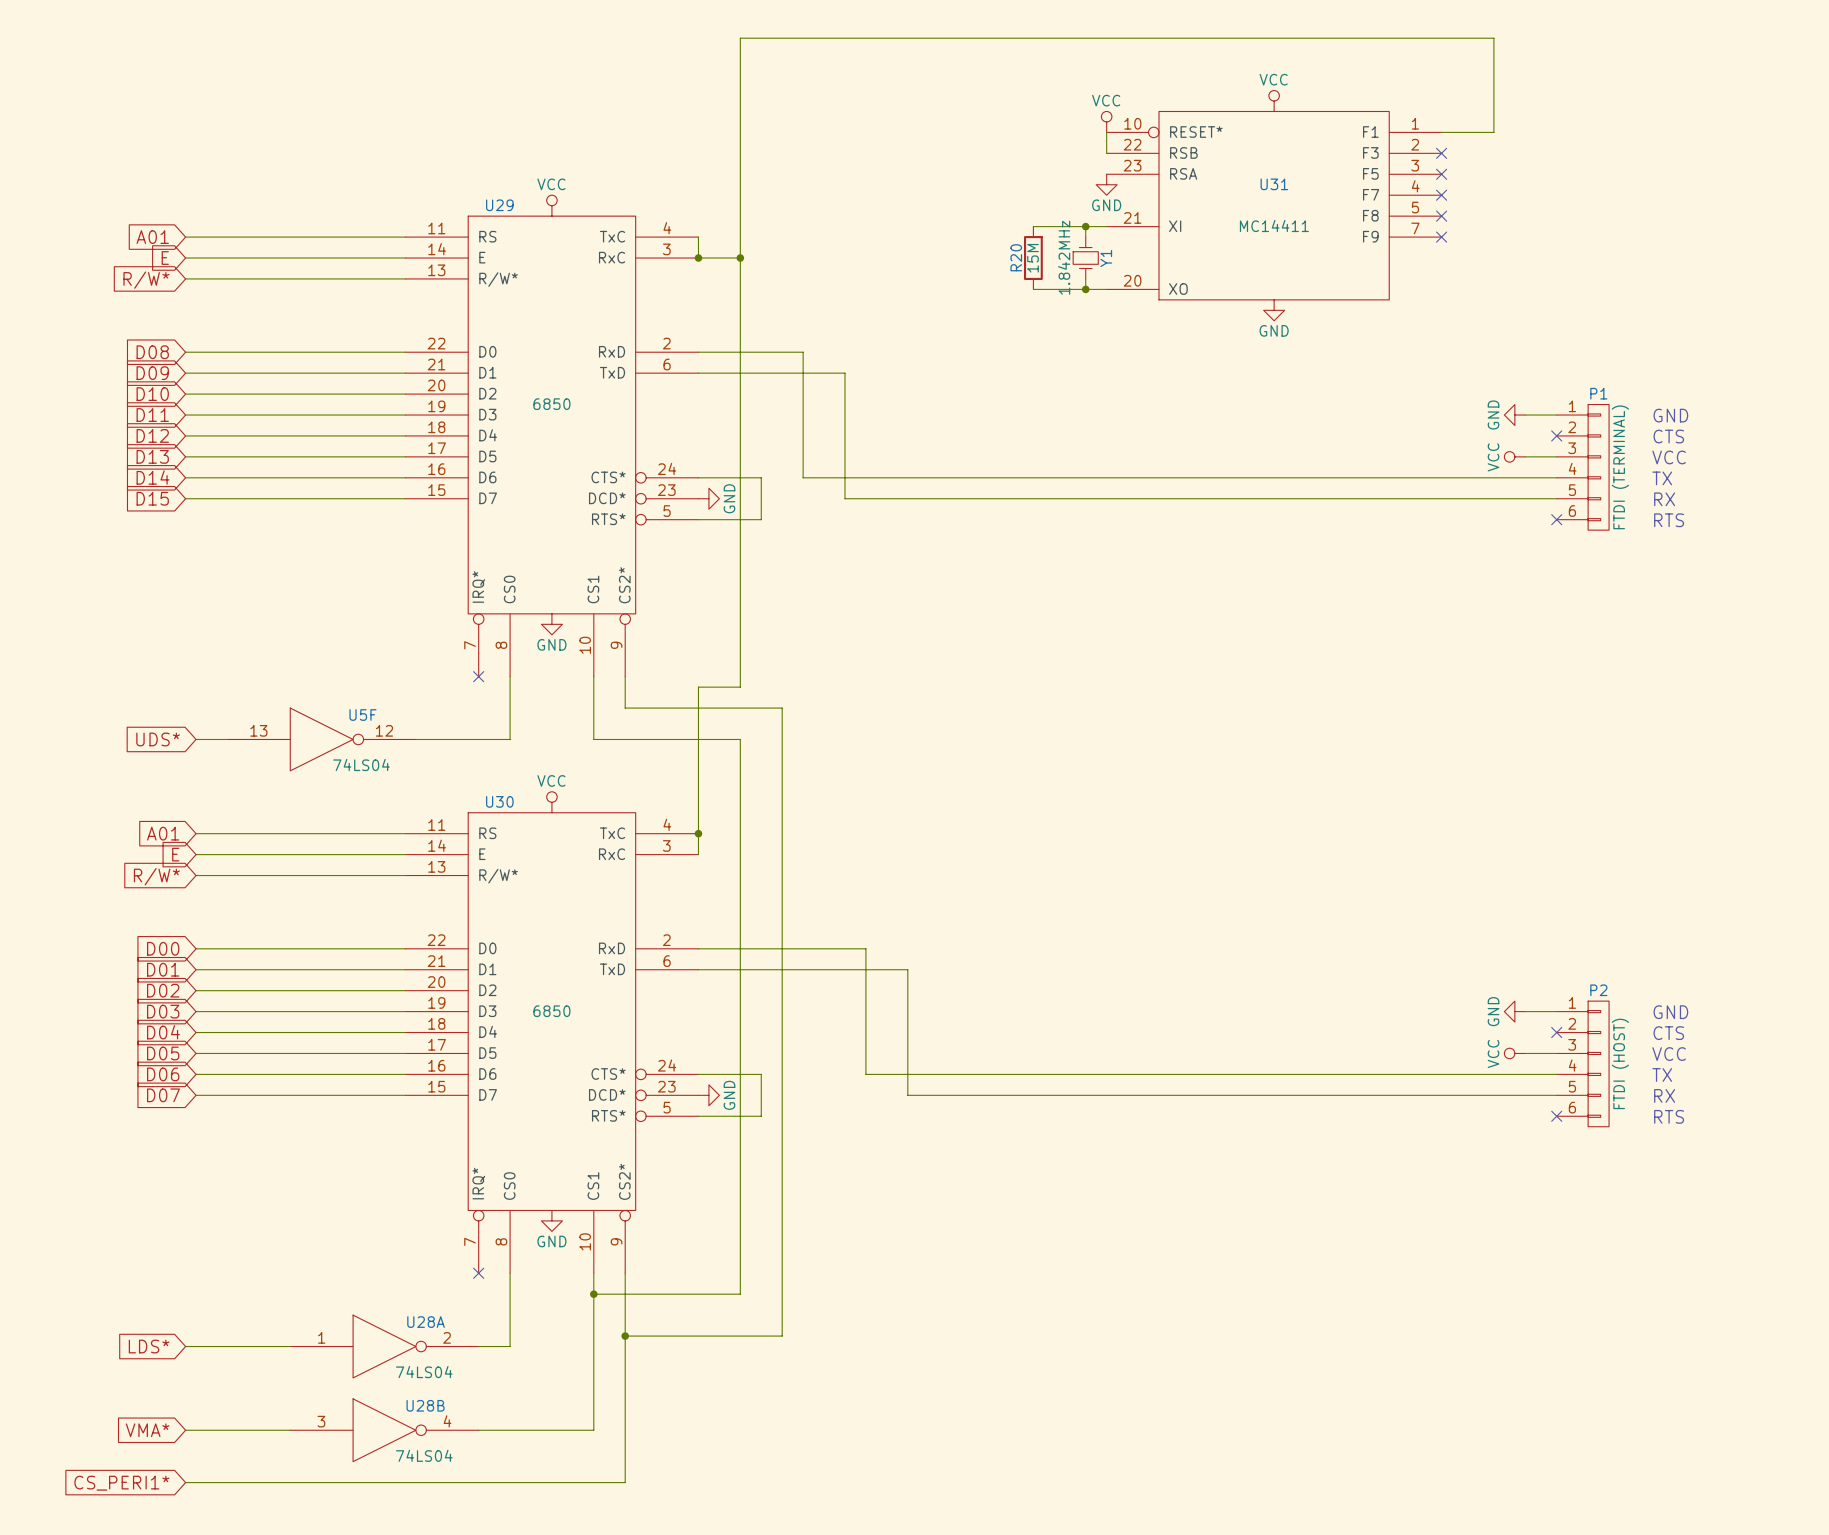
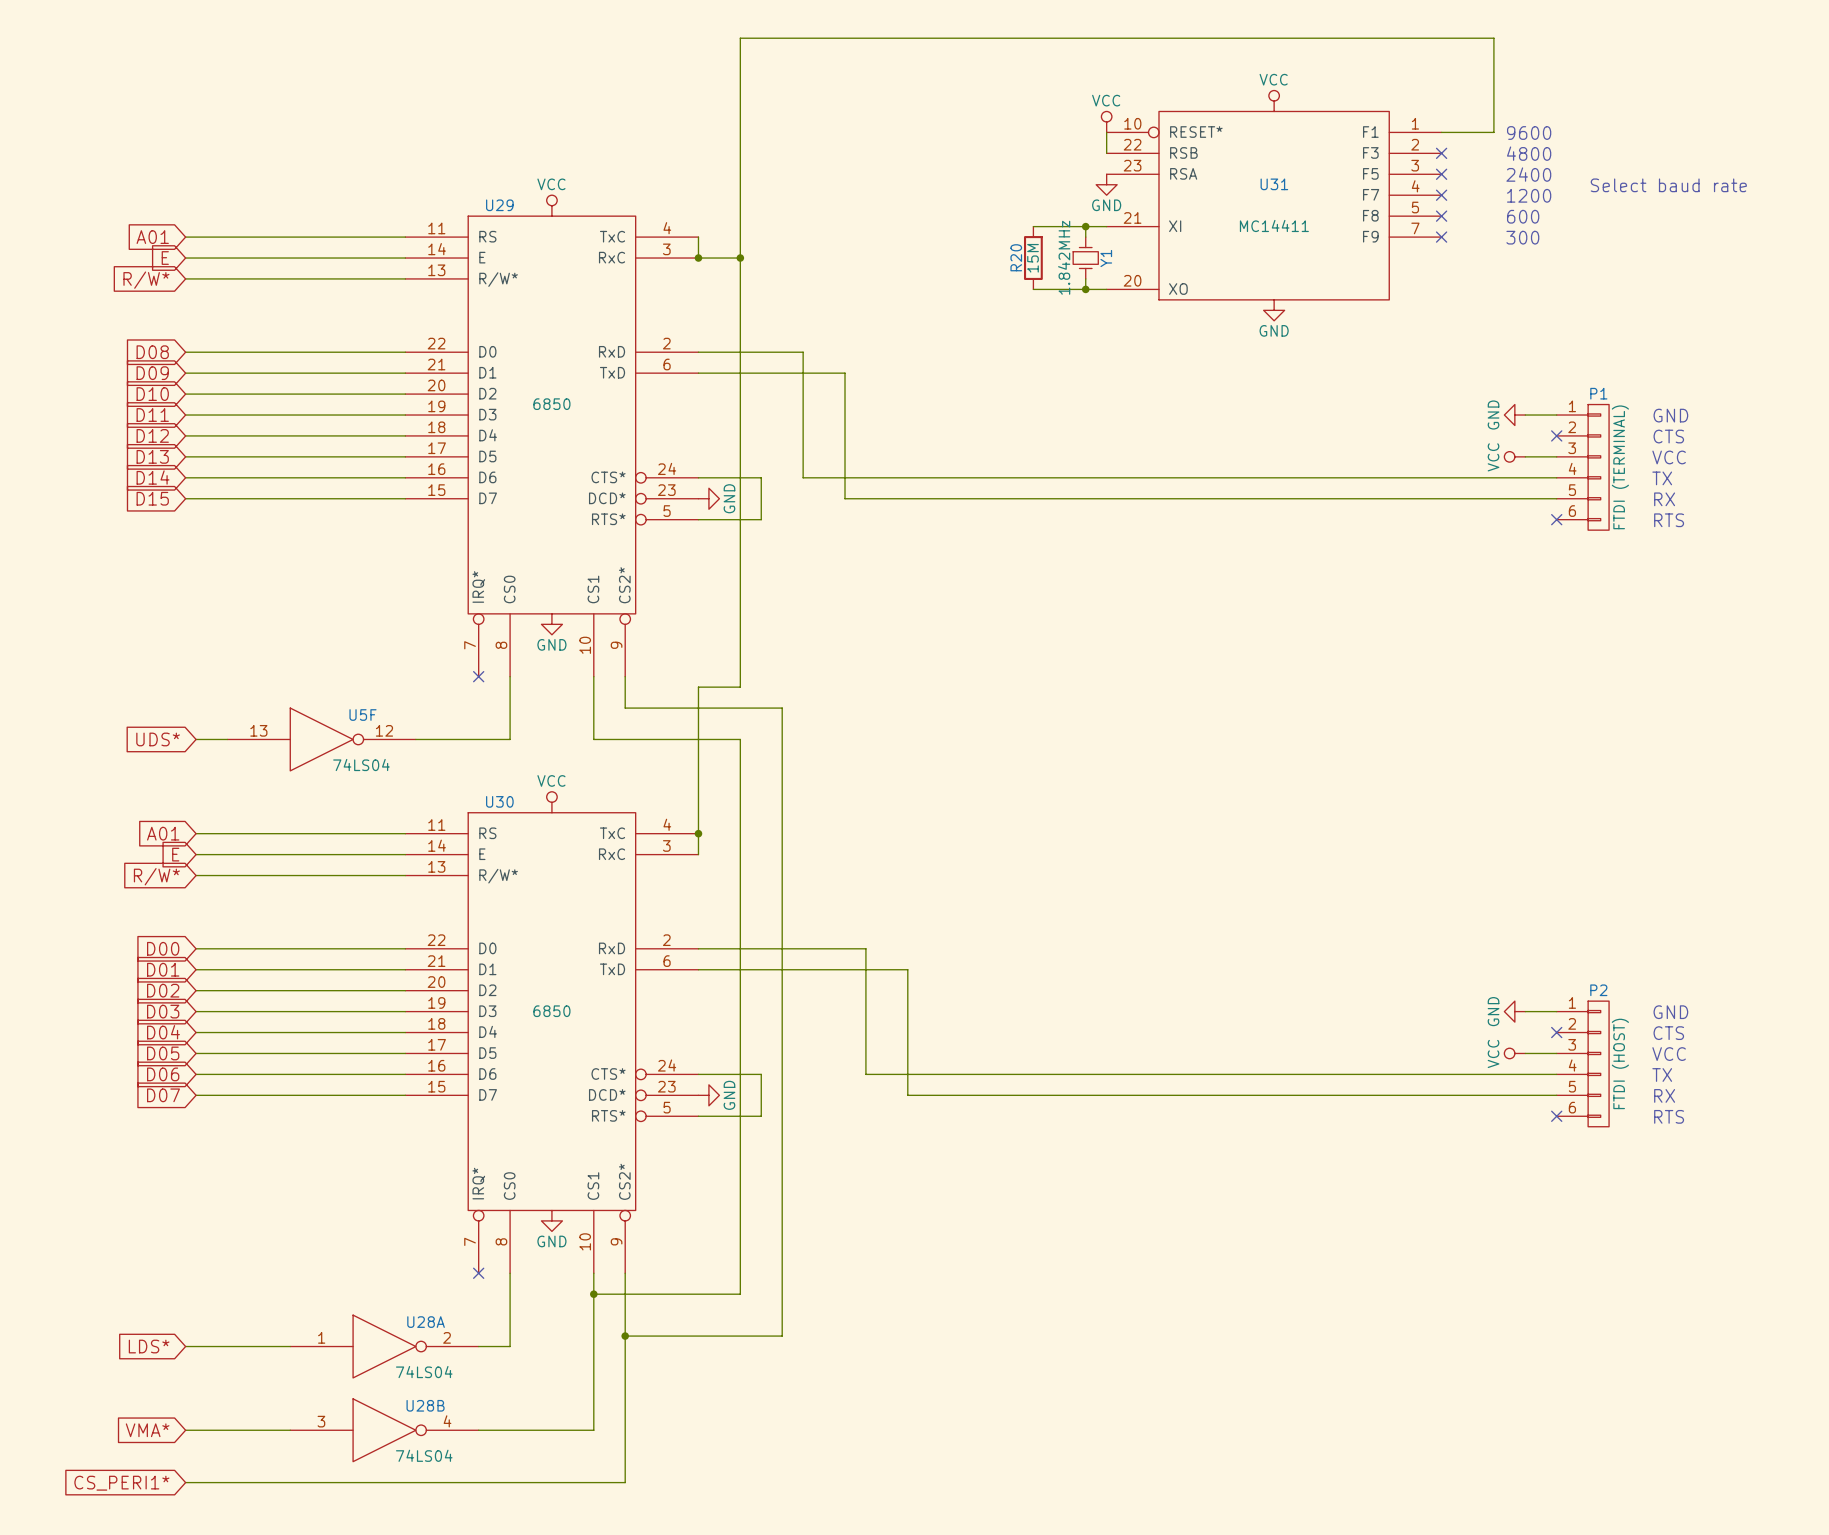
text: none -> 9600 (1529, 133)
text: none -> 4800 (1529, 153)
text: none -> 2400 (1528, 174)
text: none -> Select baud rate (1668, 185)
text: none -> 1200 (1529, 195)
text: none -> 600 (1523, 216)
text: none -> 300 (1522, 237)

